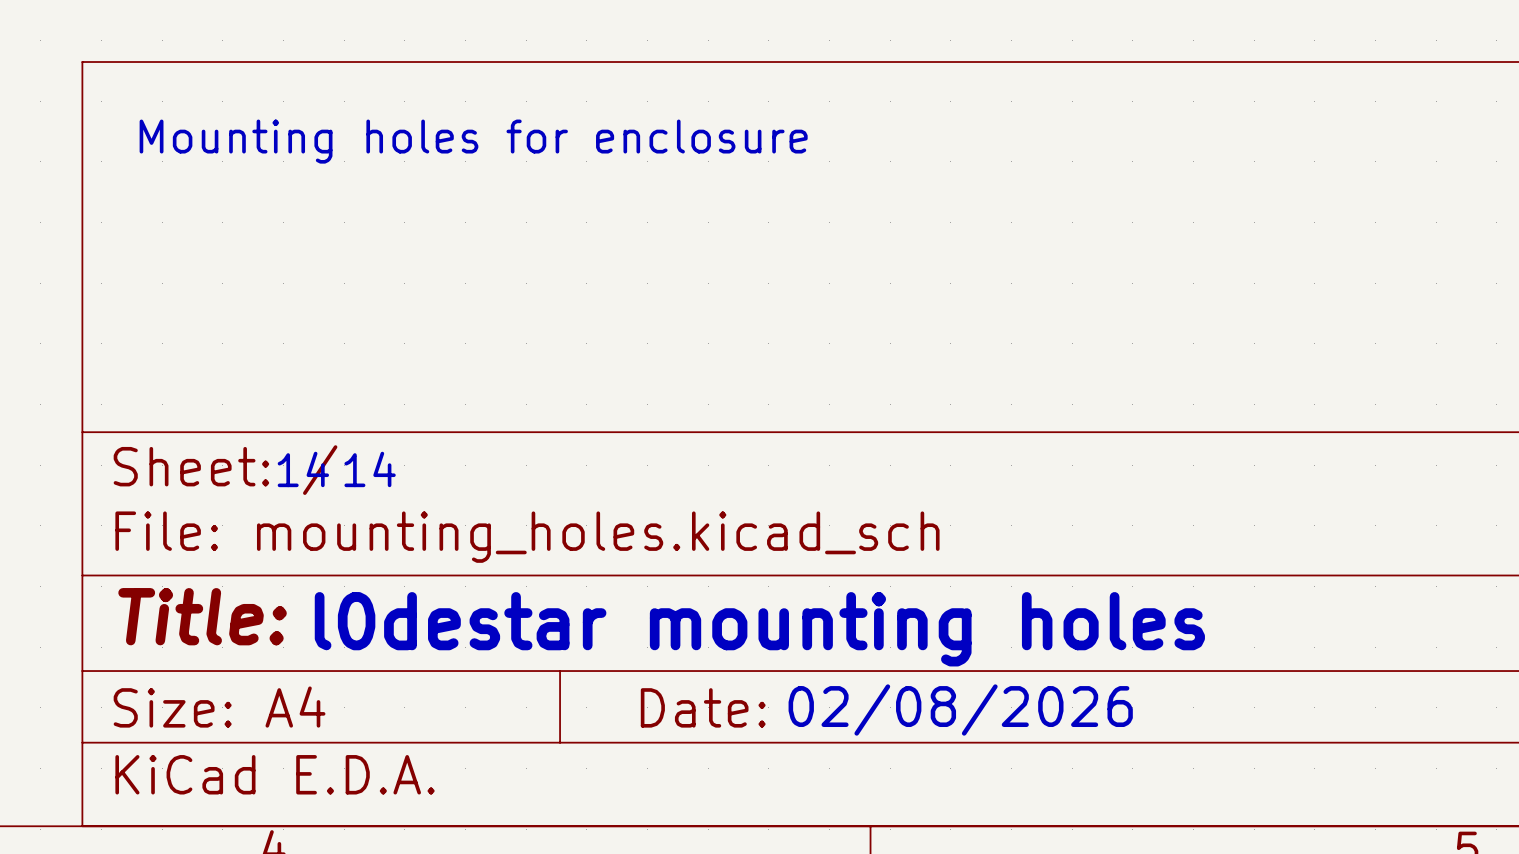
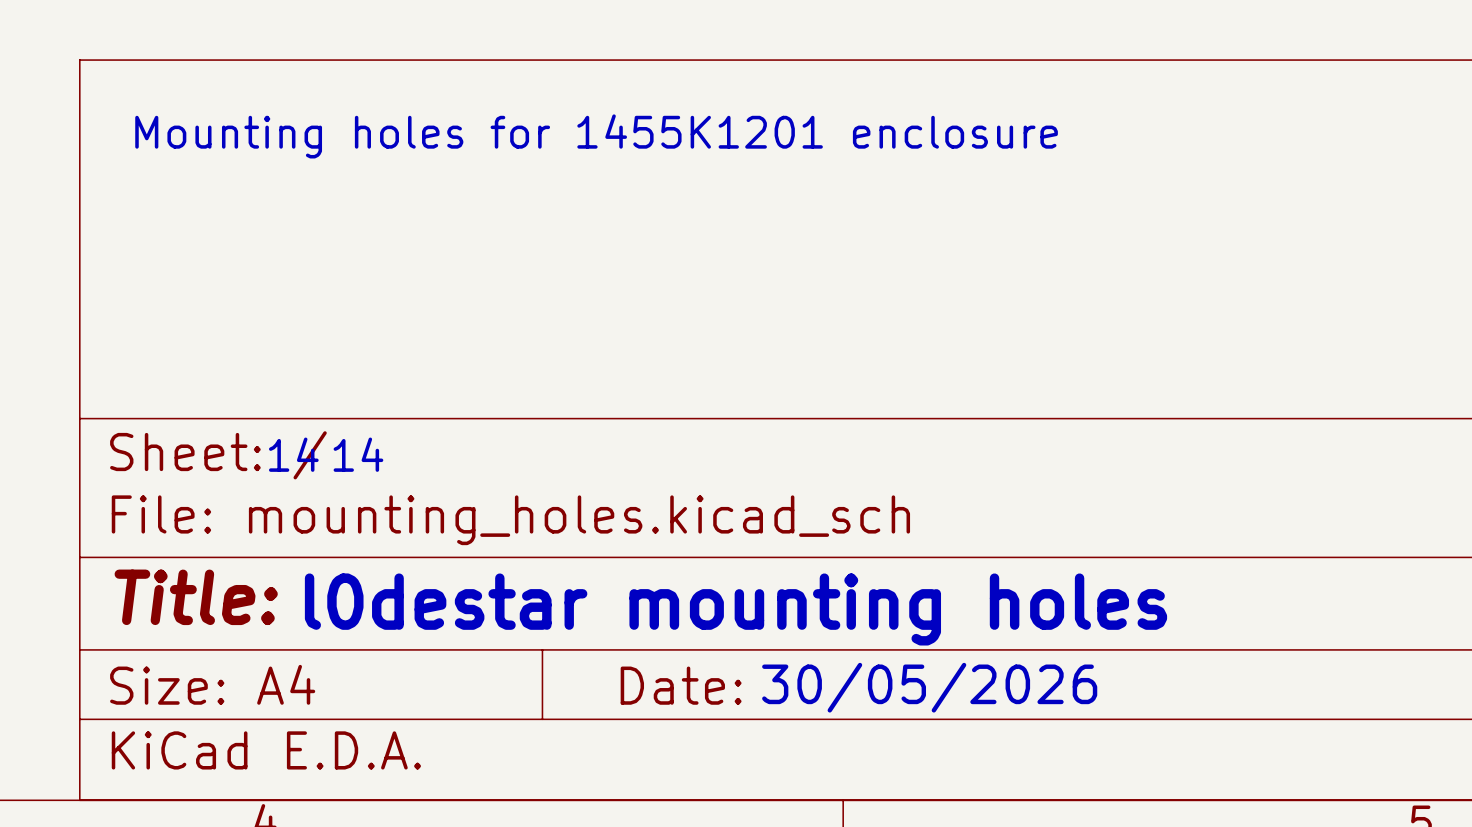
text: Mounting holes for enclosure (473, 141) -> Mounting holes for 1455K1201 enclosure (596, 136)
text: 02/08/2026 (960, 710) -> 30/05/2026 (929, 687)

